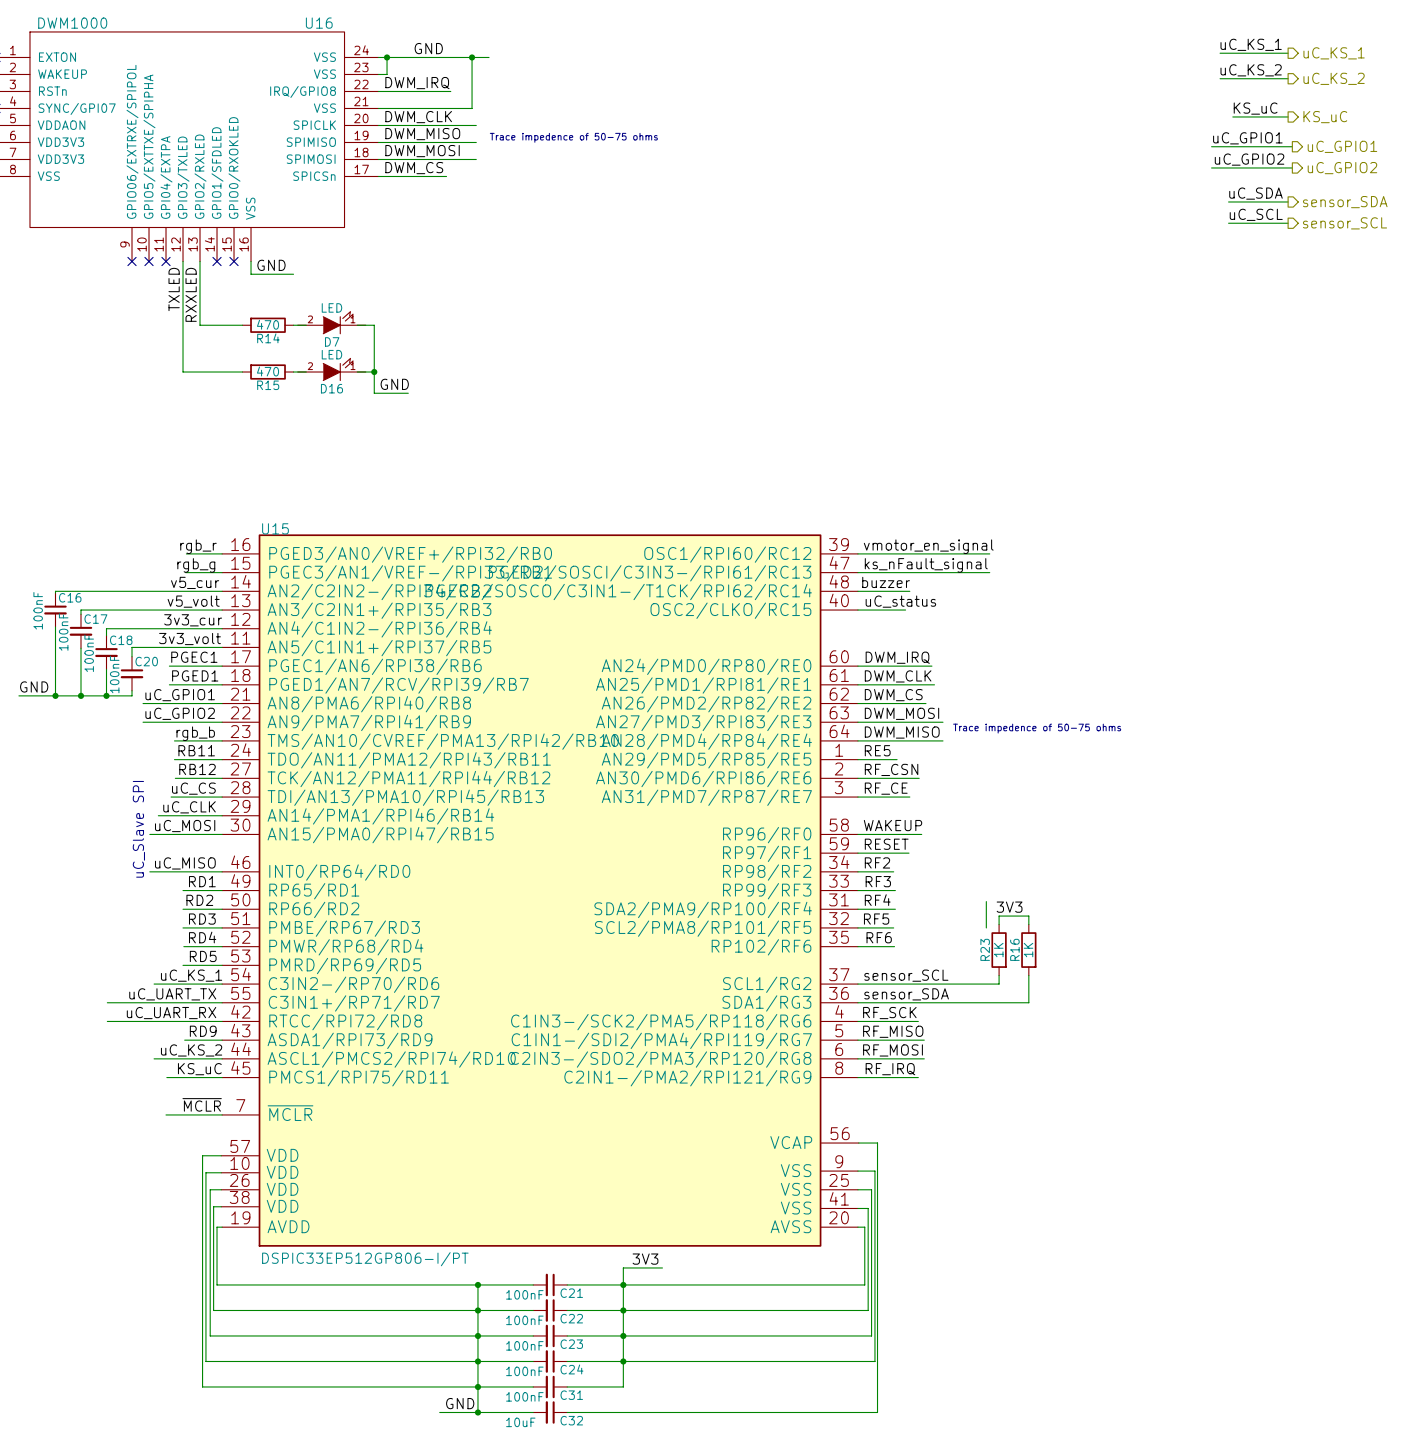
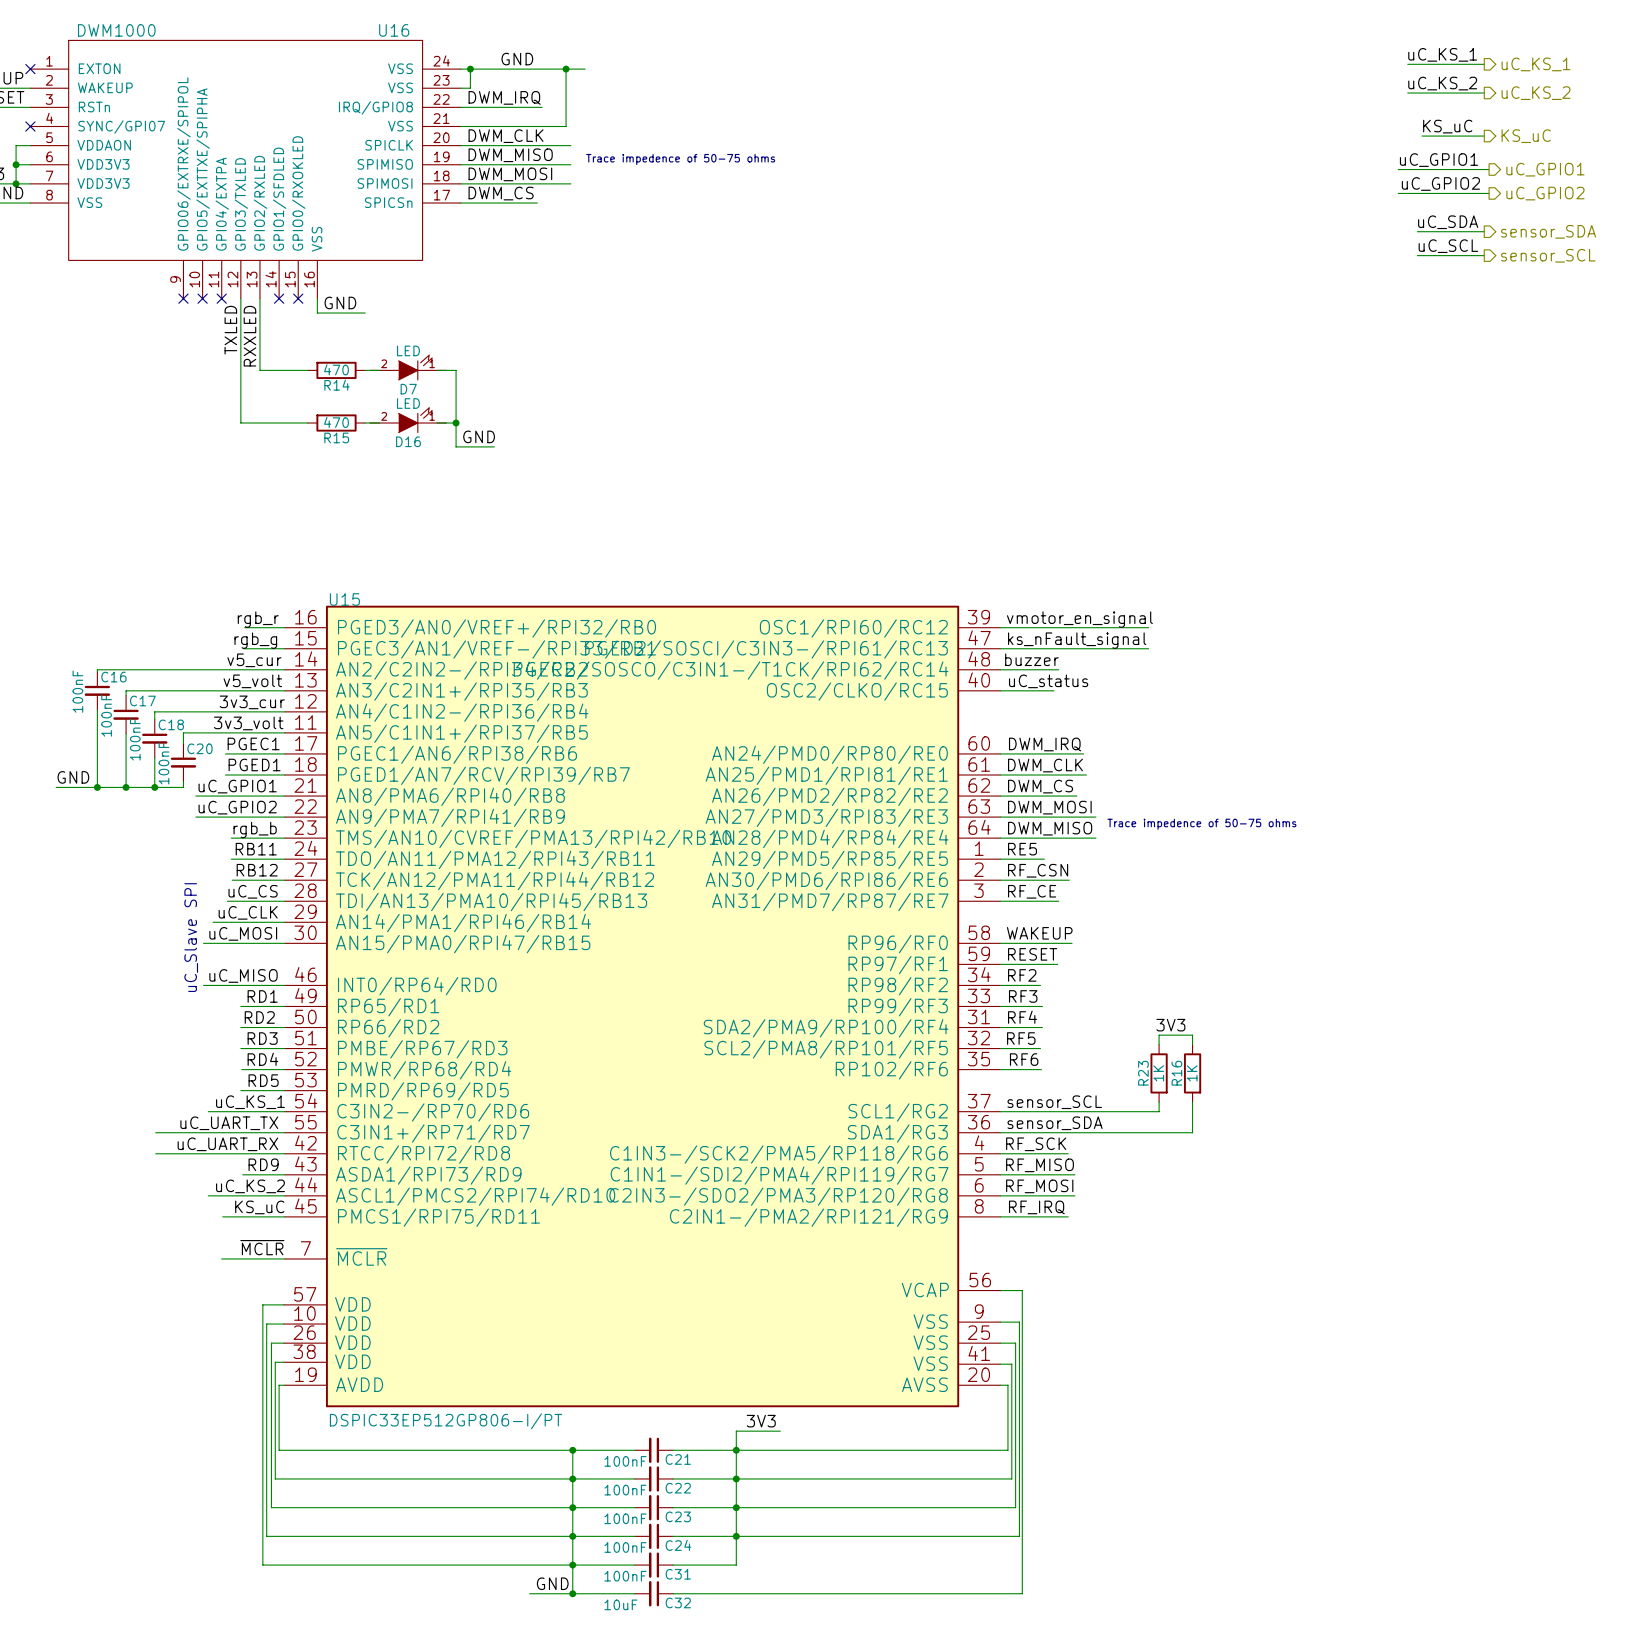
wire: (986, 901) (986, 927) -> none

